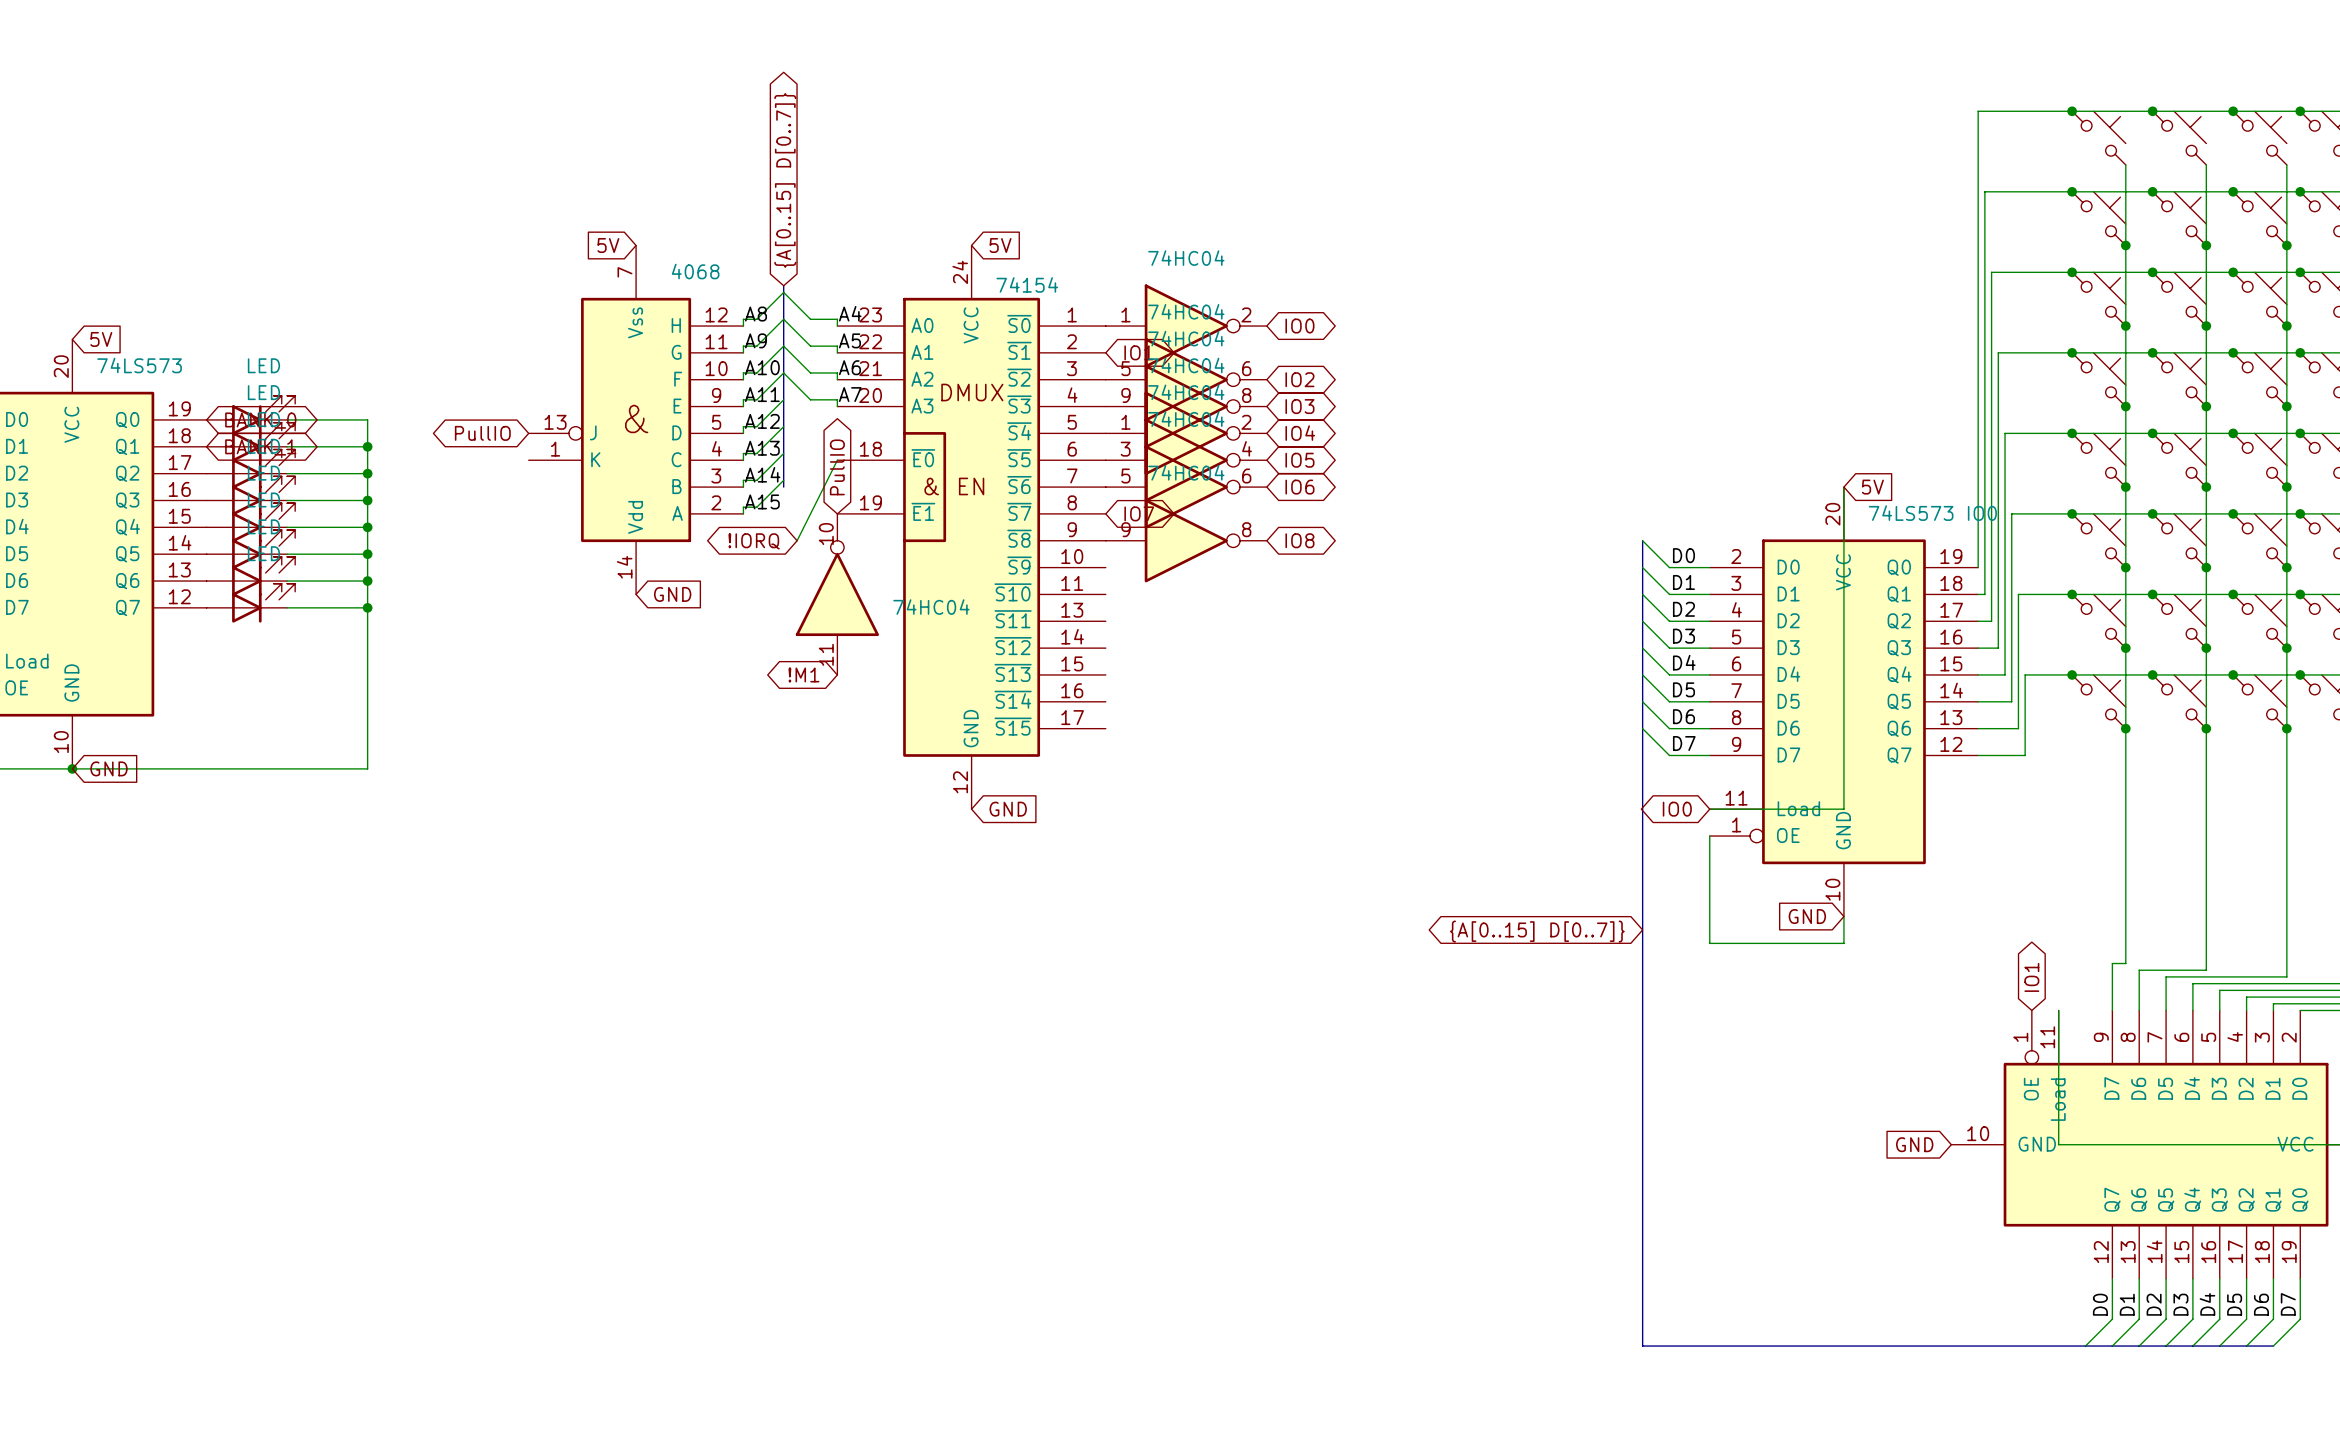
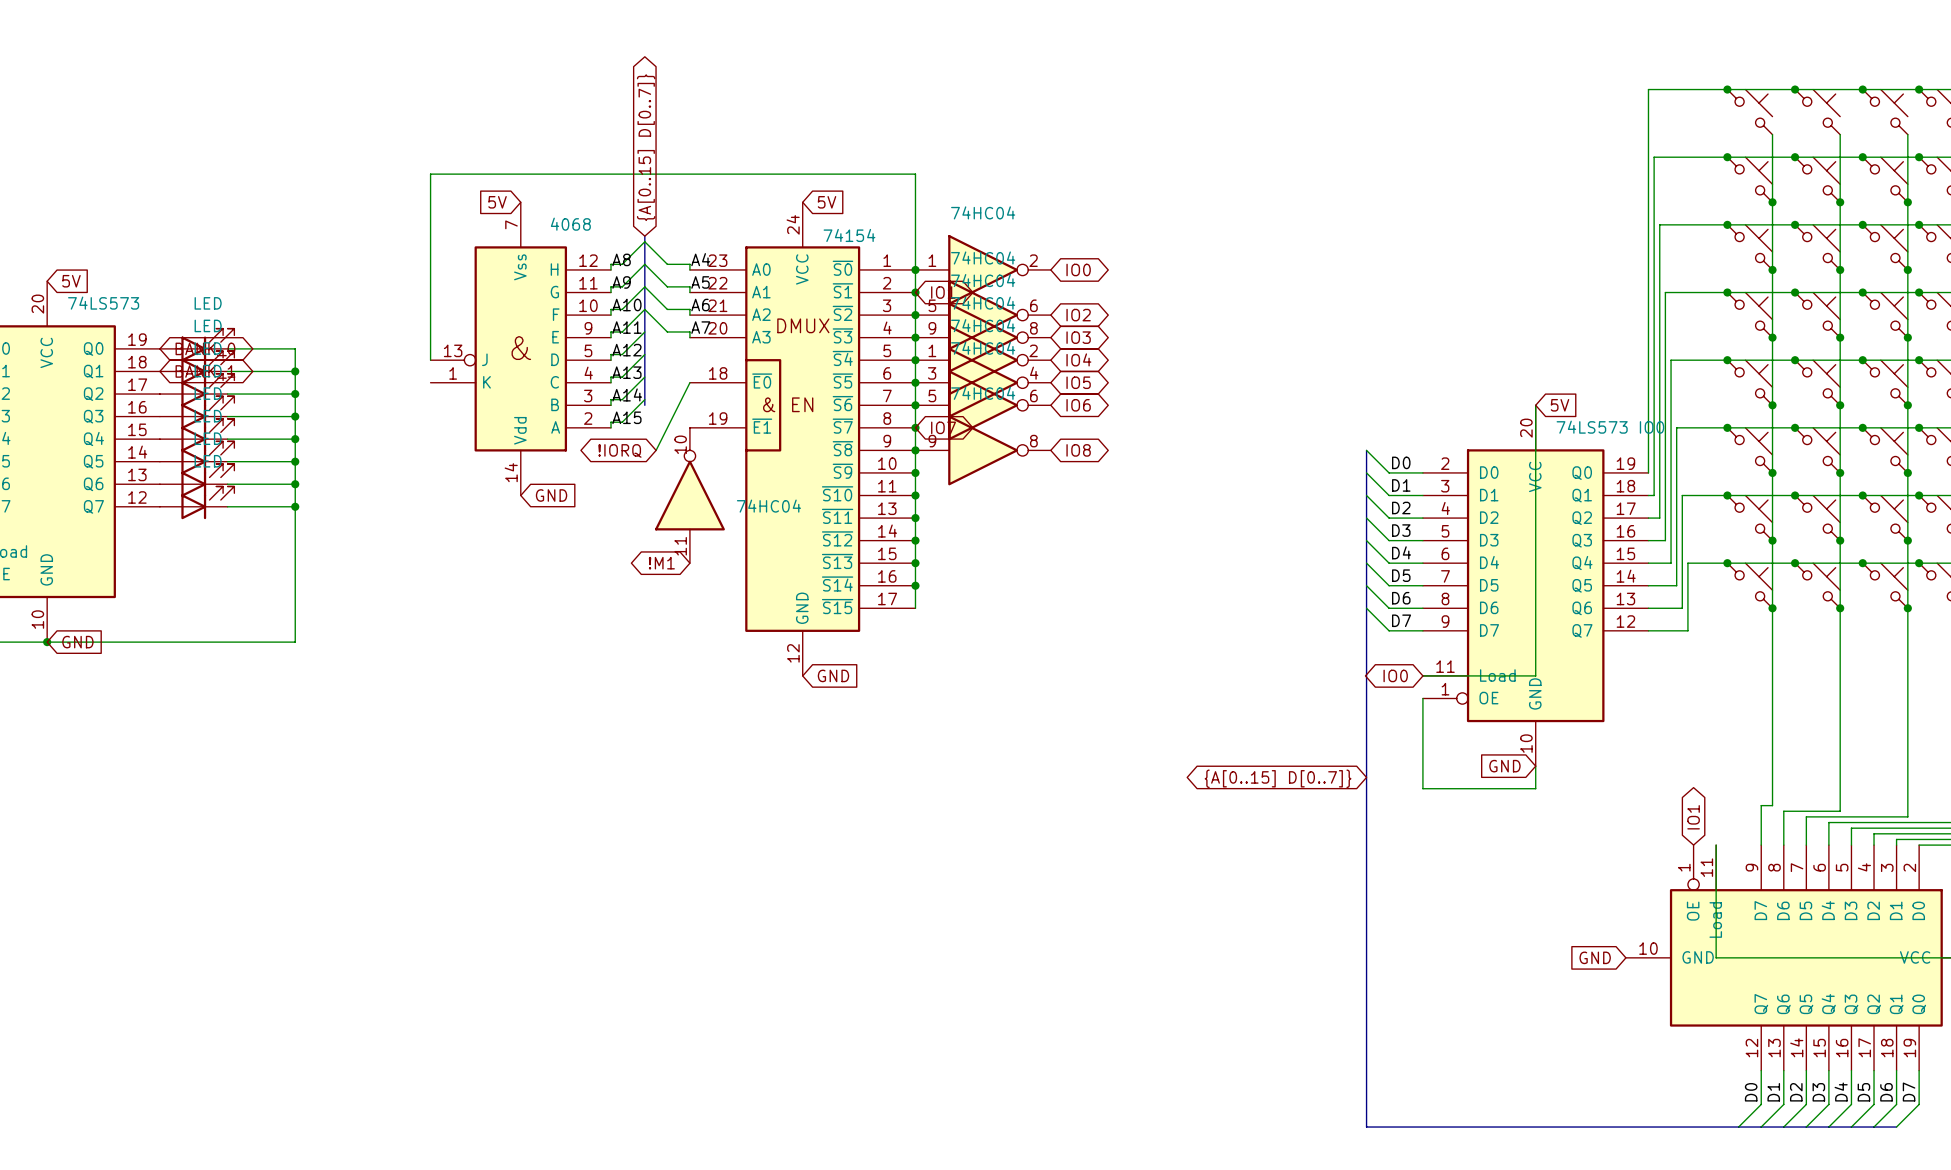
junction: none -> (915, 269)
junction: none -> (915, 292)
junction: none -> (915, 315)
junction: none -> (915, 337)
global label: PullIO (482, 433) -> none
wire: none -> (430, 360) (430, 174) (915, 174) (915, 608)
junction: none -> (915, 360)
junction: none -> (915, 382)
global label: PullIO (837, 467) -> none
junction: none -> (915, 405)
junction: none -> (915, 427)
junction: none -> (915, 450)
junction: none -> (915, 472)
junction: none -> (915, 495)
junction: none -> (915, 518)
junction: none -> (915, 540)
junction: none -> (915, 563)
junction: none -> (915, 585)

